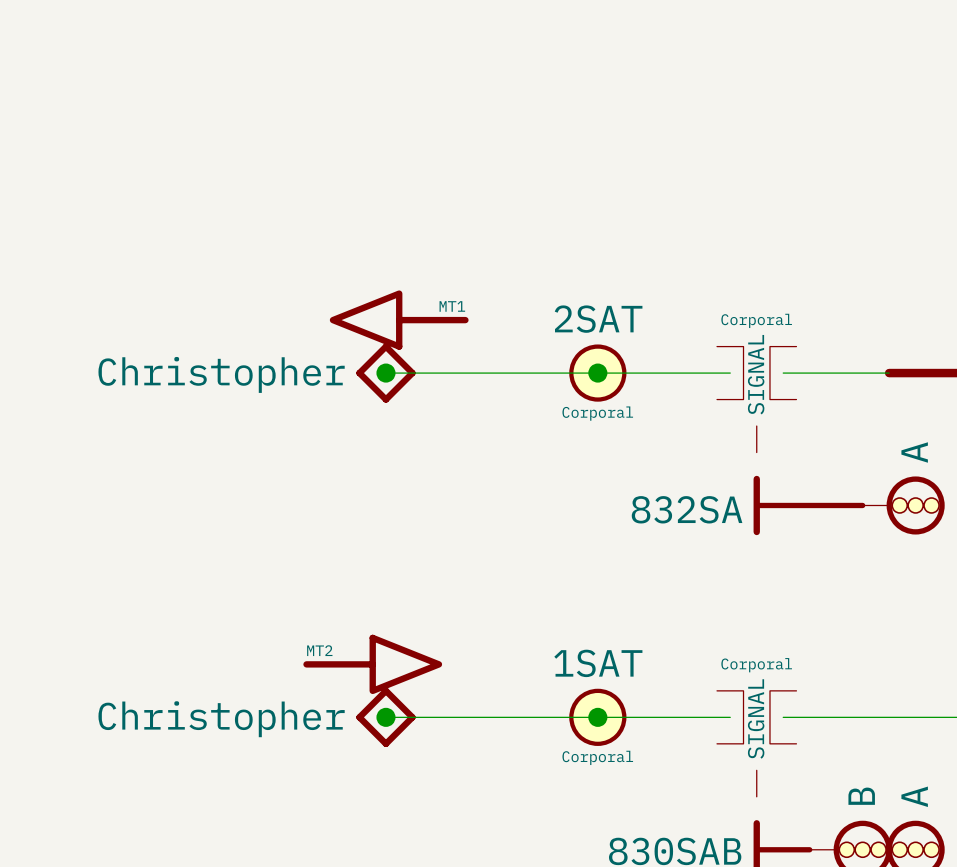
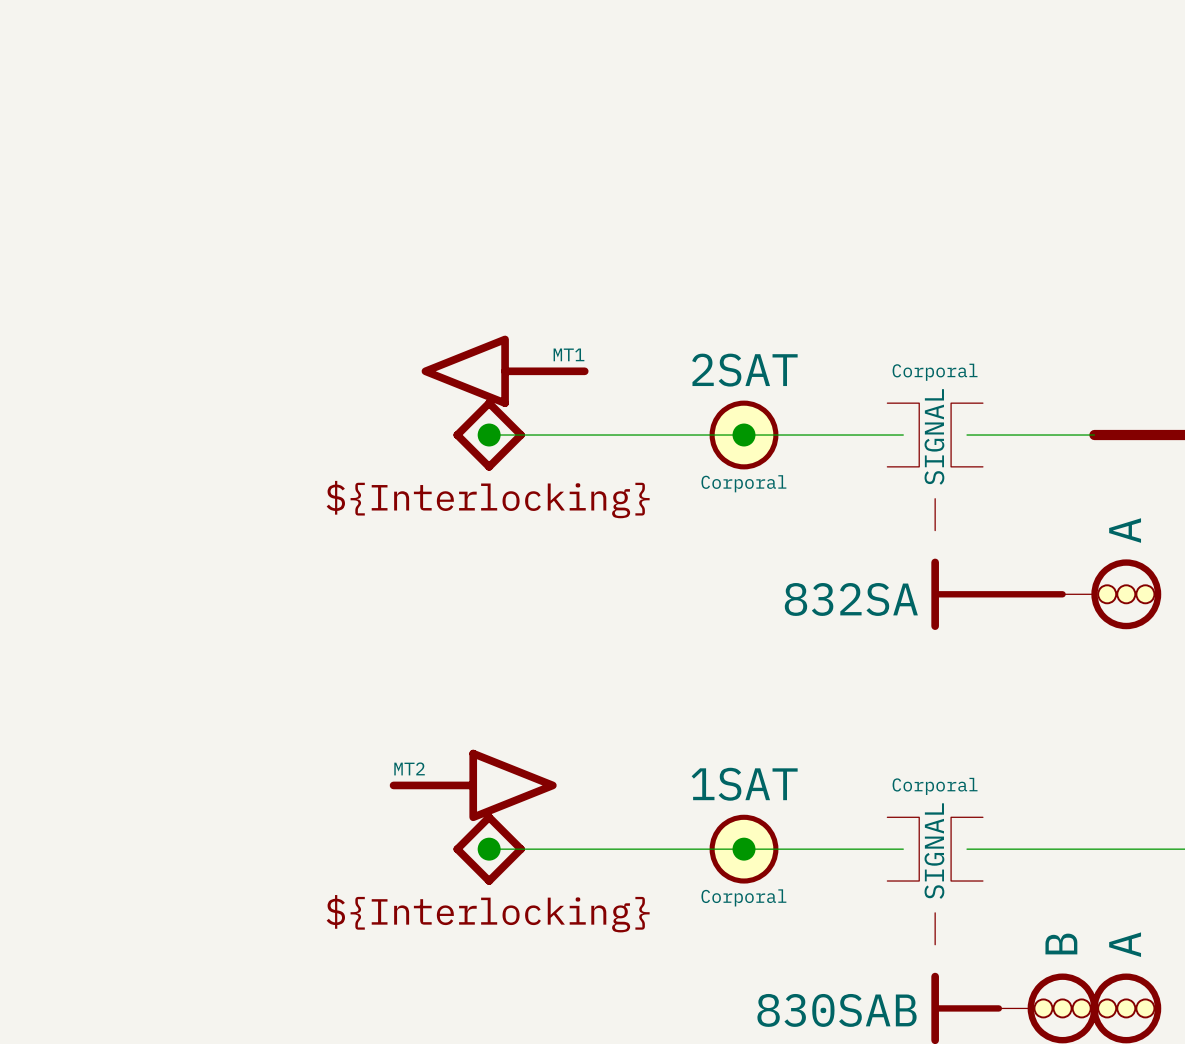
part value: Christopher (221, 374) -> none
part text: none -> ${Interlocking} (488, 499)
part value: Christopher (221, 719) -> none
part text: none -> ${Interlocking} (488, 913)

